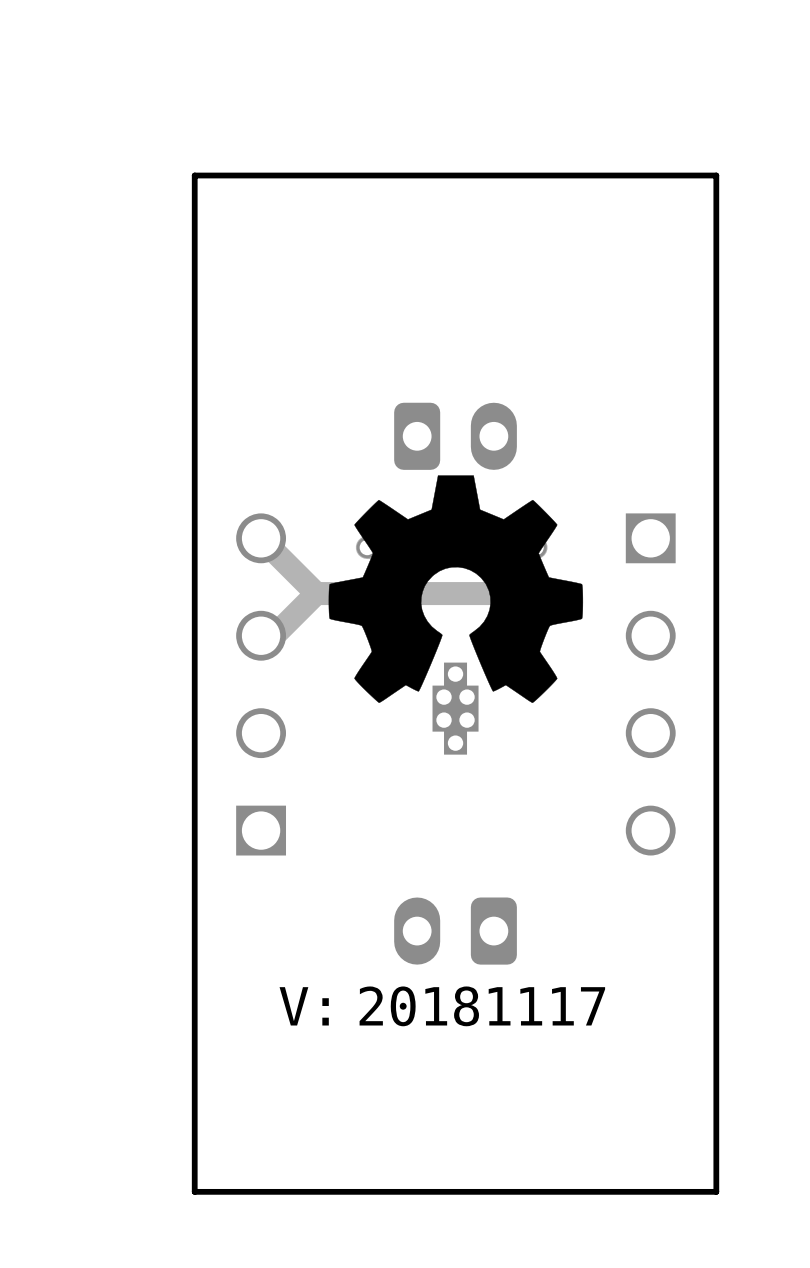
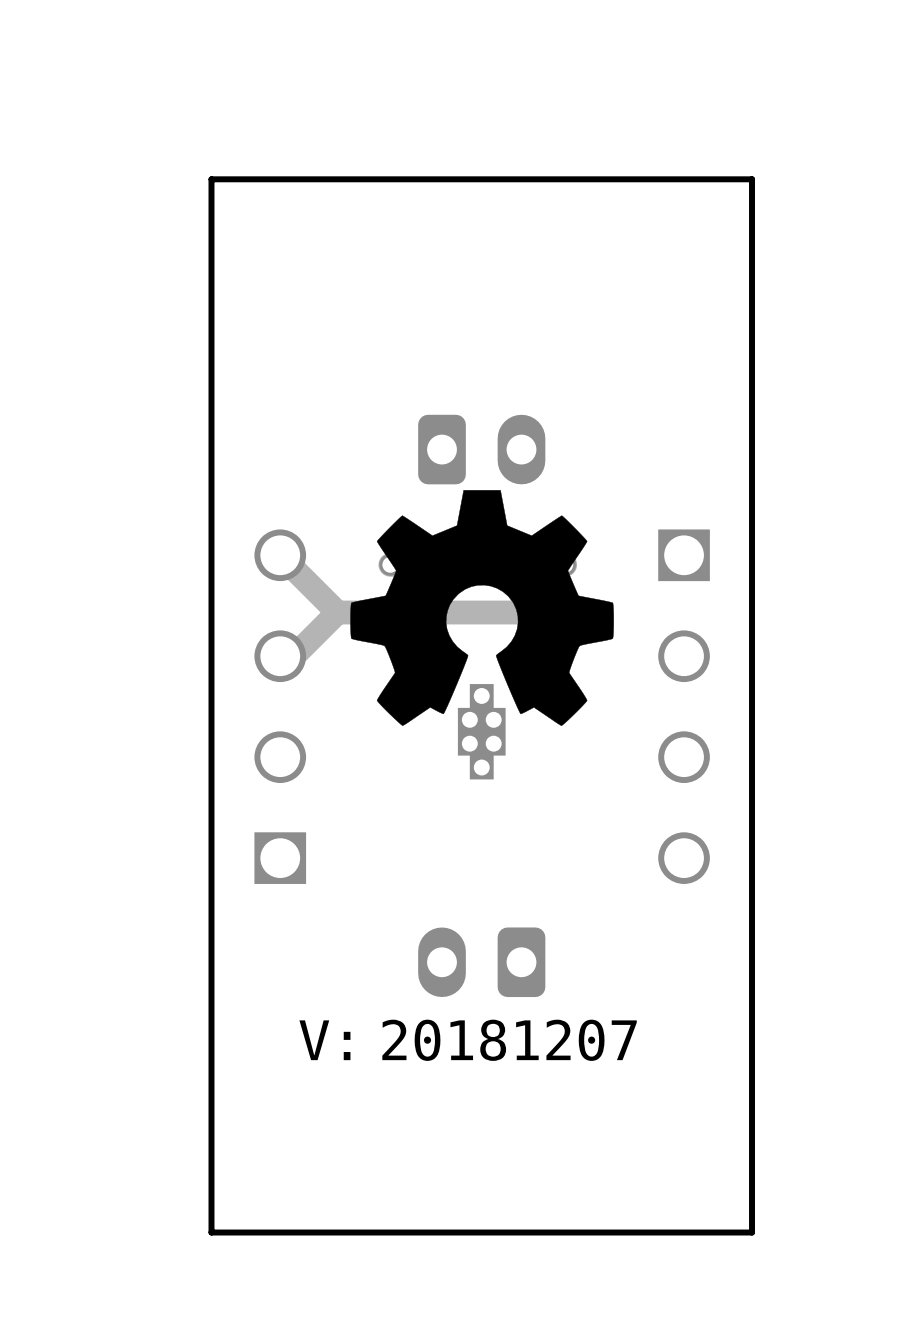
drawing shape: [279, 986, 606, 1027] -> [299, 1019, 637, 1061]

